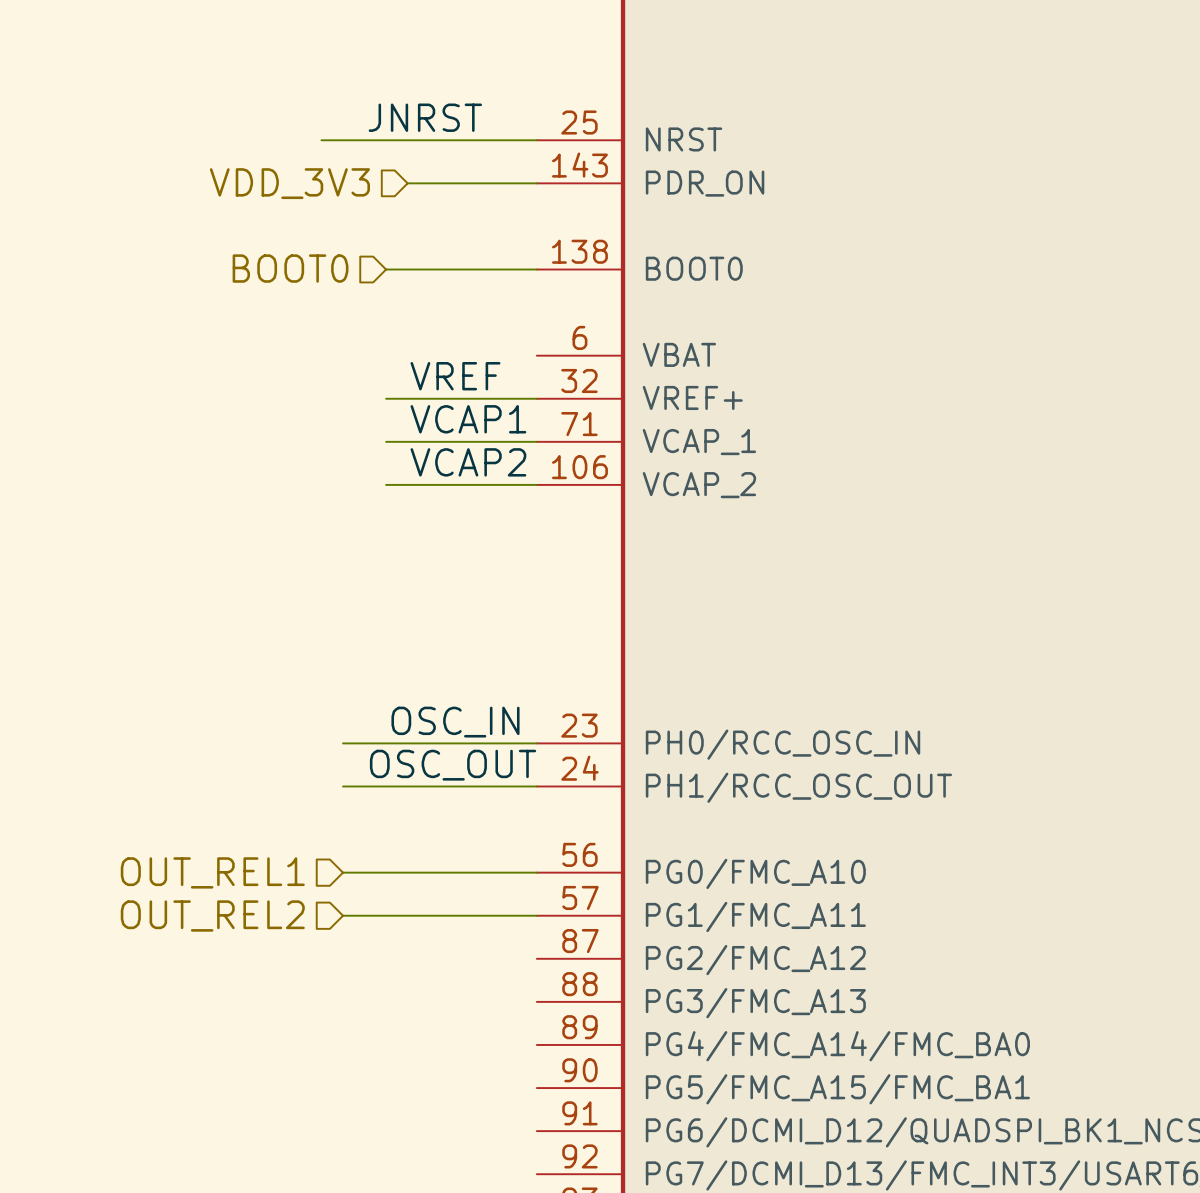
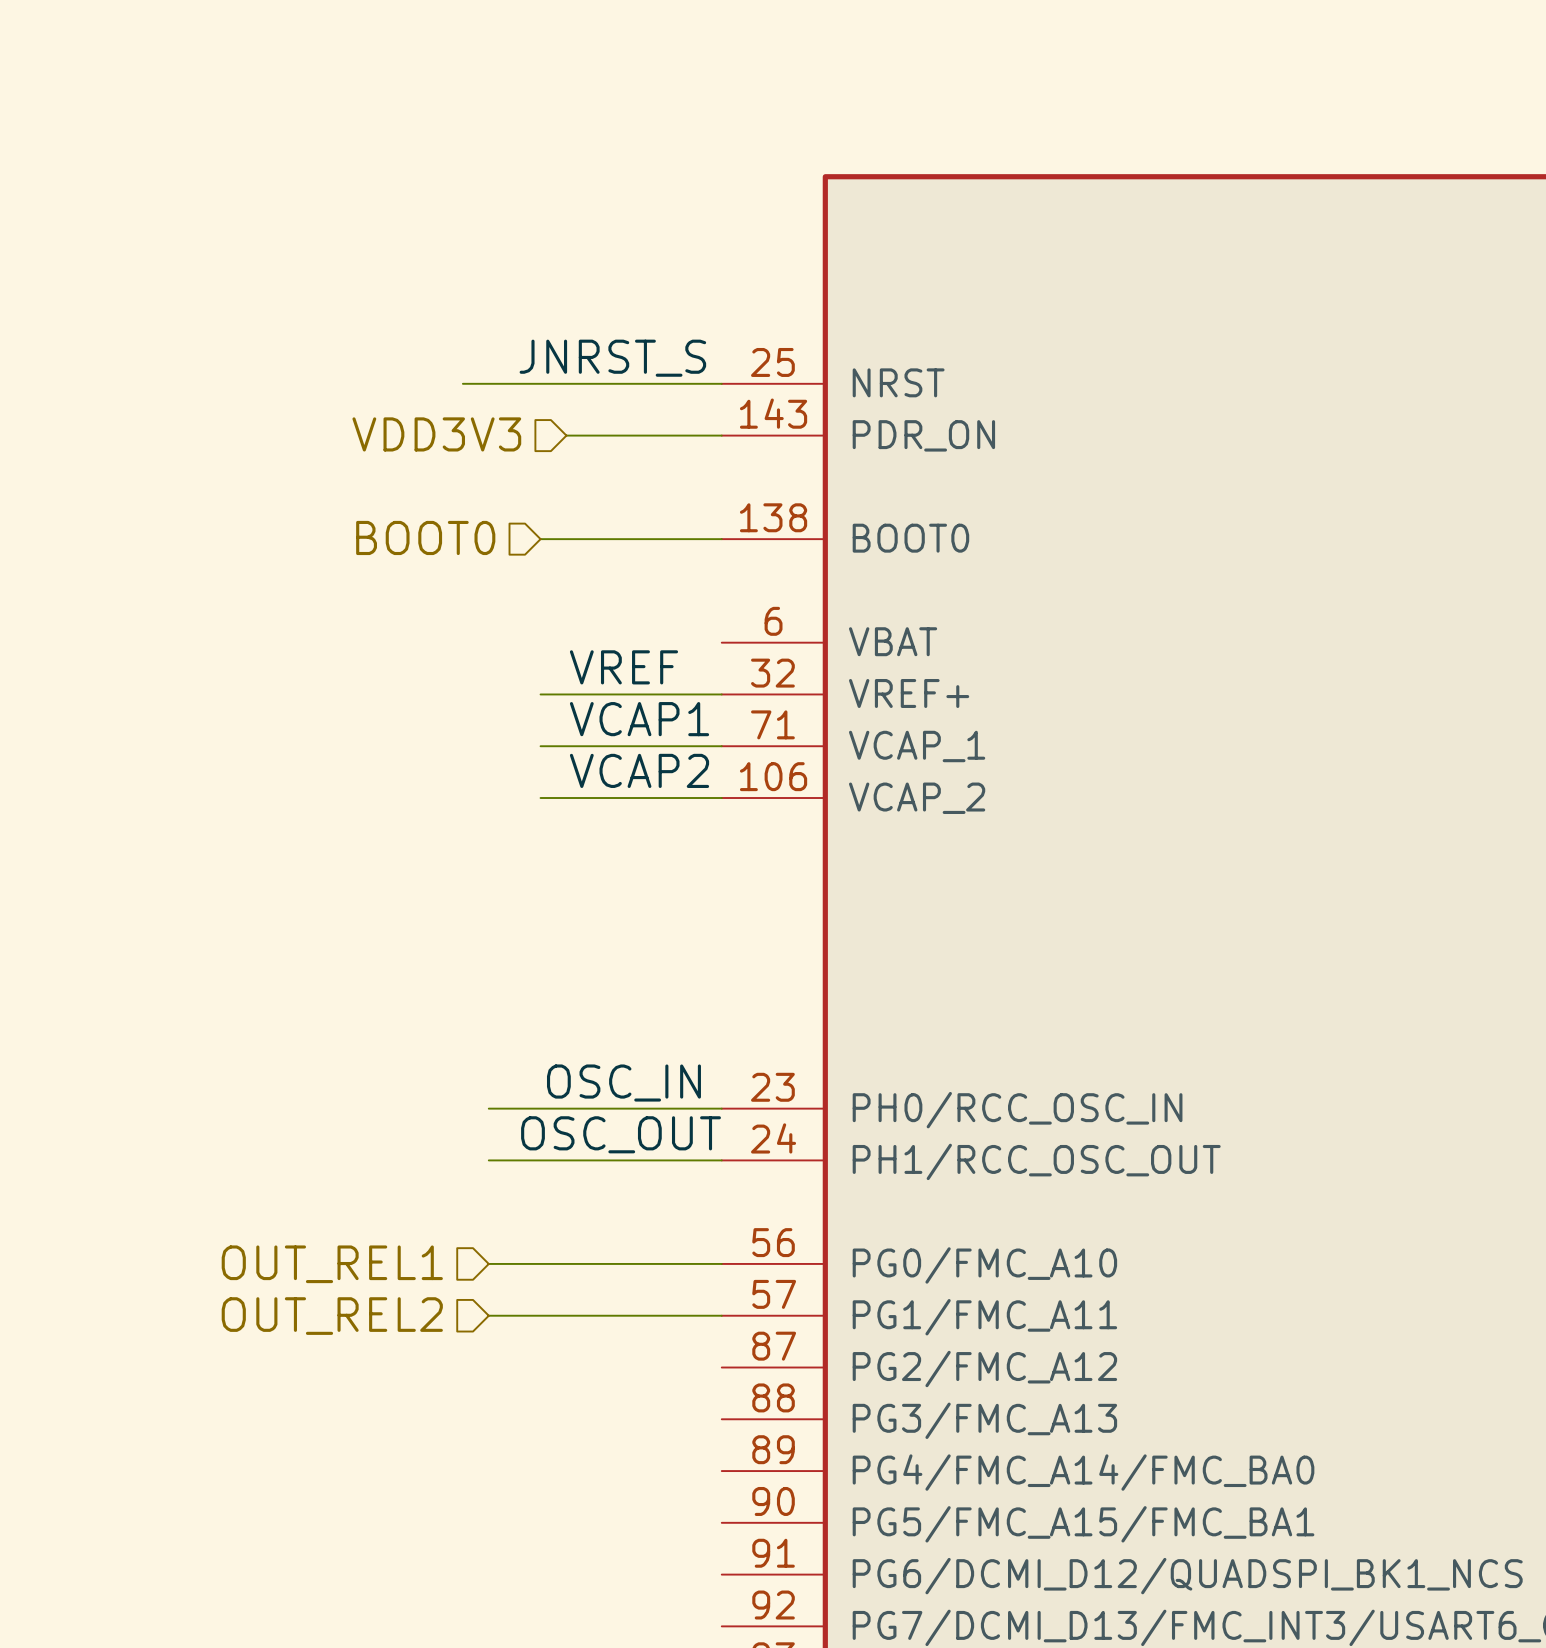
label: JNRST (425, 117) -> JNRST_S (612, 358)
hierarchical label: VDD_3V3 (289, 183) -> VDD3V3 (436, 434)

